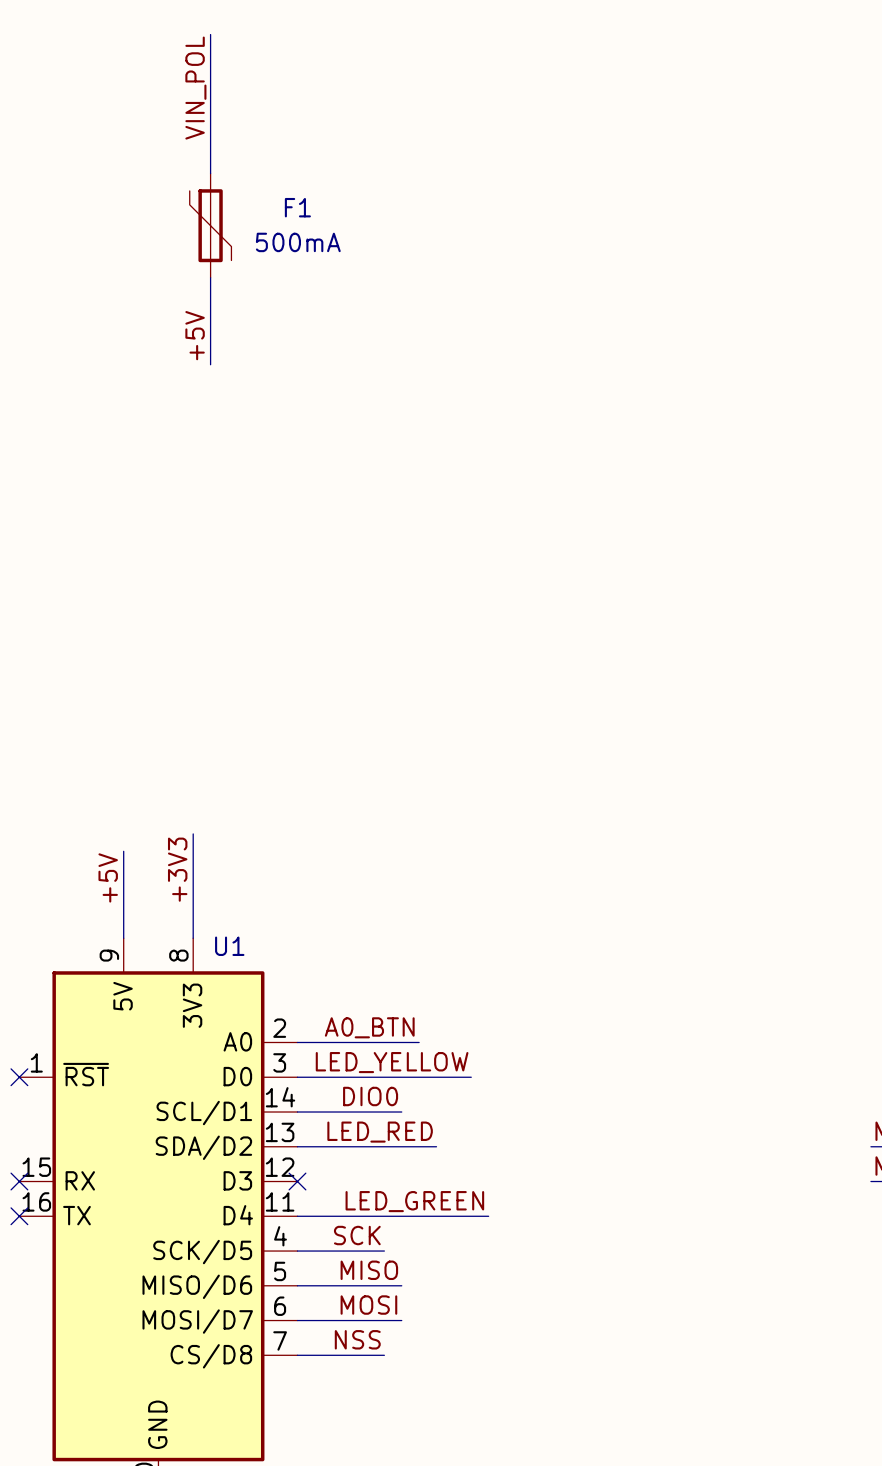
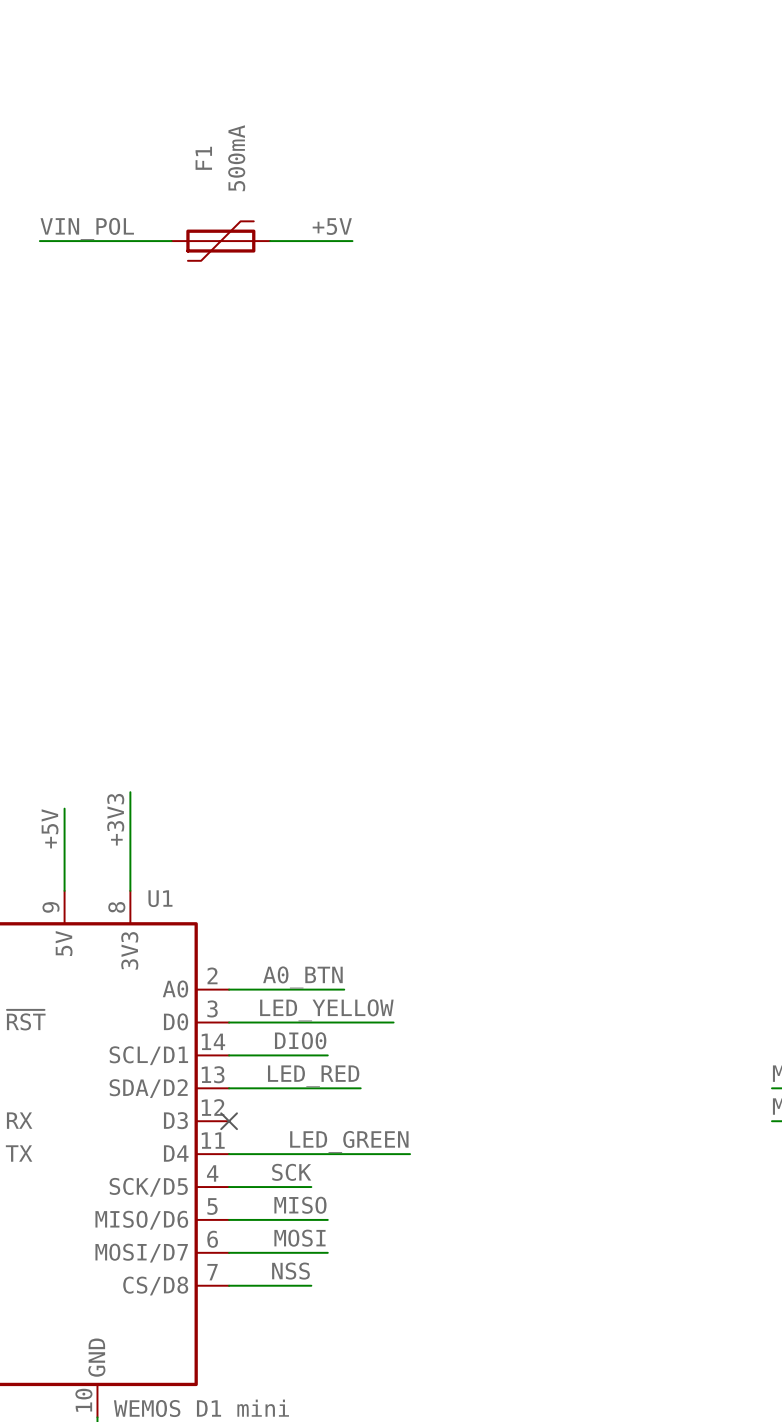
wire: (210, 34) (210, 173) -> none
label rotation: 0° (195, 88) -> 90° clockwise (87, 228)
label position: VIN_POL (195, 88) -> VIN_POL (87, 228)
F1 name position: F1 (297, 207) -> F1 (203, 158)
F1 rotation: 0° (210, 225) -> 90° clockwise (220, 241)
F1 position: (210, 225) -> (220, 241)
F1 value position: 500mA (298, 242) -> 500mA (236, 158)
wire: none -> (39, 241) (171, 241)
wire: none -> (270, 241) (352, 241)
wire: (210, 277) (210, 364) -> none
label rotation: 0° (195, 335) -> 90° clockwise (332, 226)
label position: +5V (195, 335) -> +5V (332, 226)

